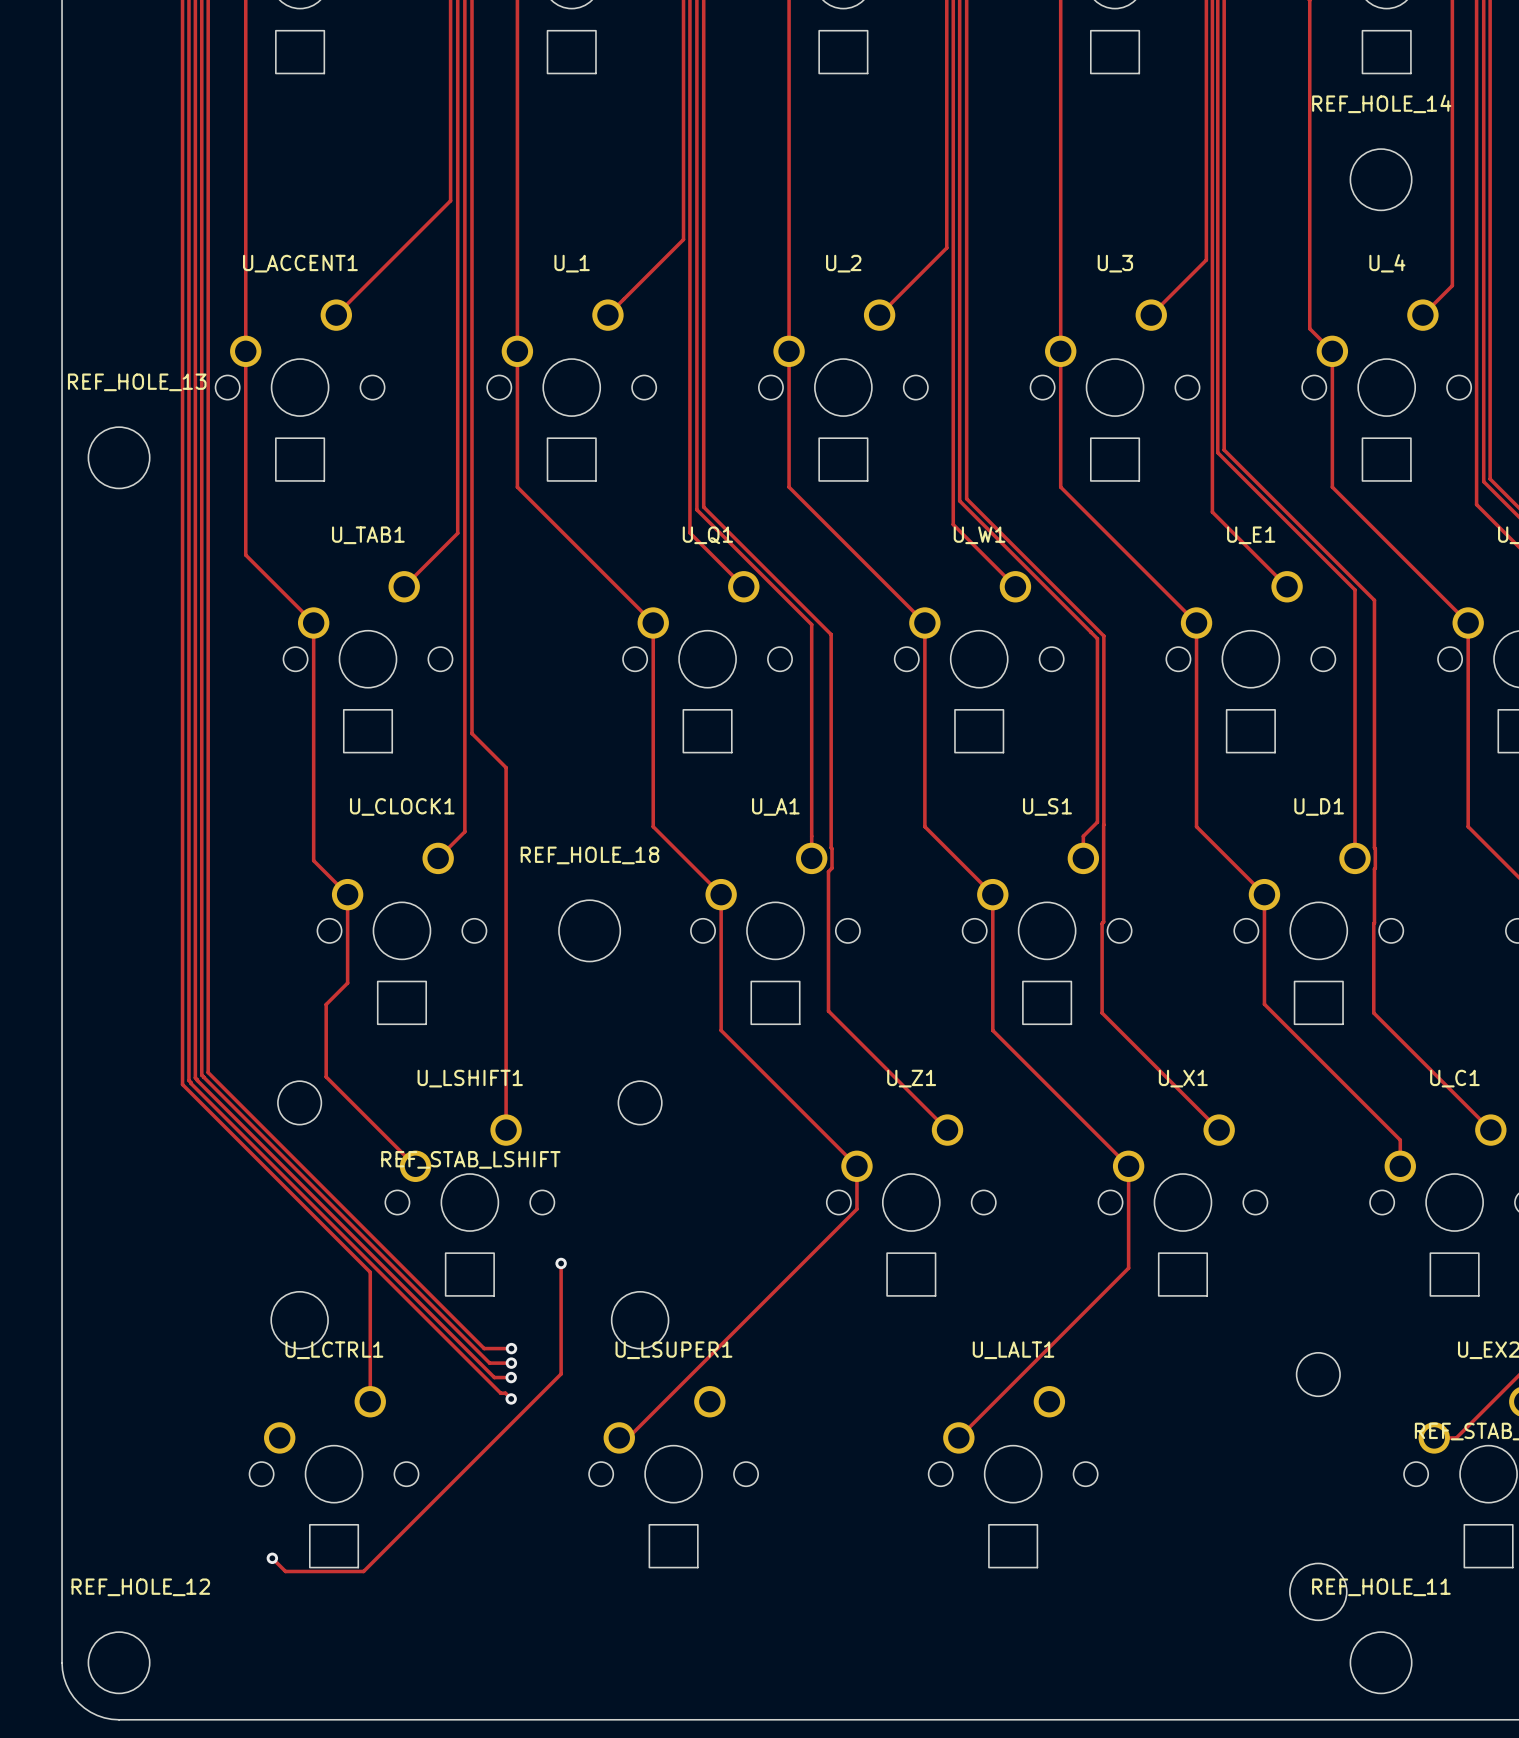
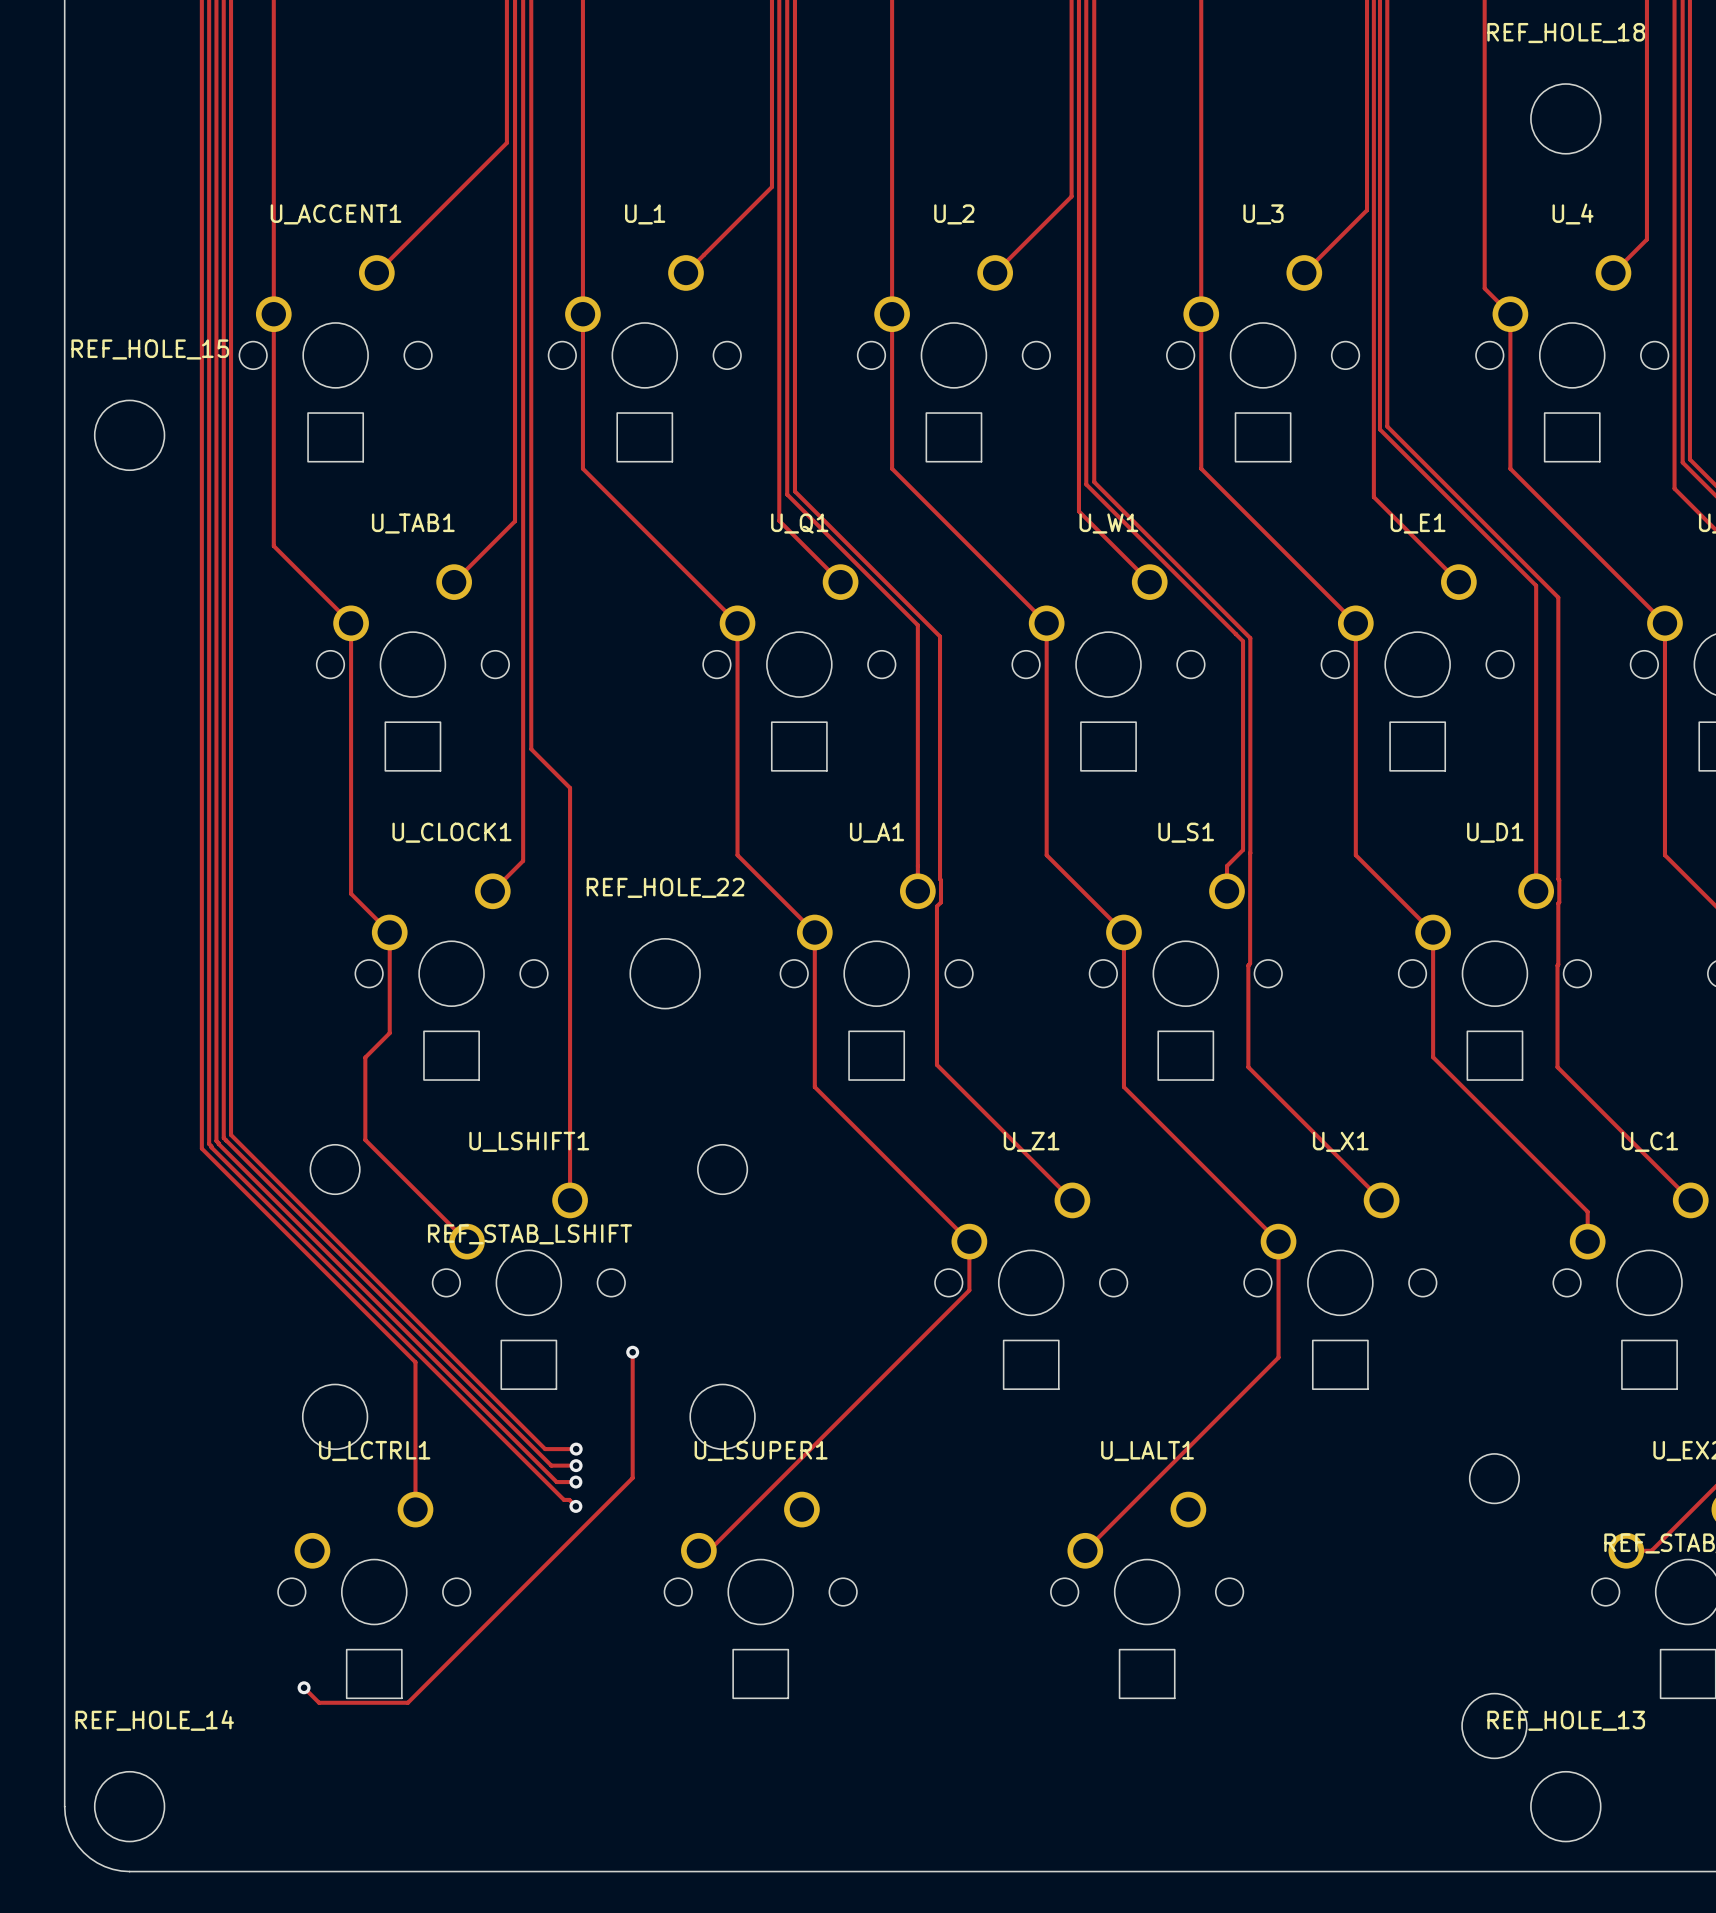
REF_HOLE_14 name: REF_HOLE_14 (1381, 103) -> REF_HOLE_18 (1566, 33)
REF_HOLE_13 name: REF_HOLE_13 (137, 382) -> REF_HOLE_15 (150, 349)
REF_HOLE_18 name: REF_HOLE_18 (589, 855) -> REF_HOLE_22 (665, 887)
REF_HOLE_12 name: REF_HOLE_12 (140, 1587) -> REF_HOLE_14 (154, 1720)
REF_HOLE_11 name: REF_HOLE_11 (1381, 1587) -> REF_HOLE_13 (1566, 1720)

